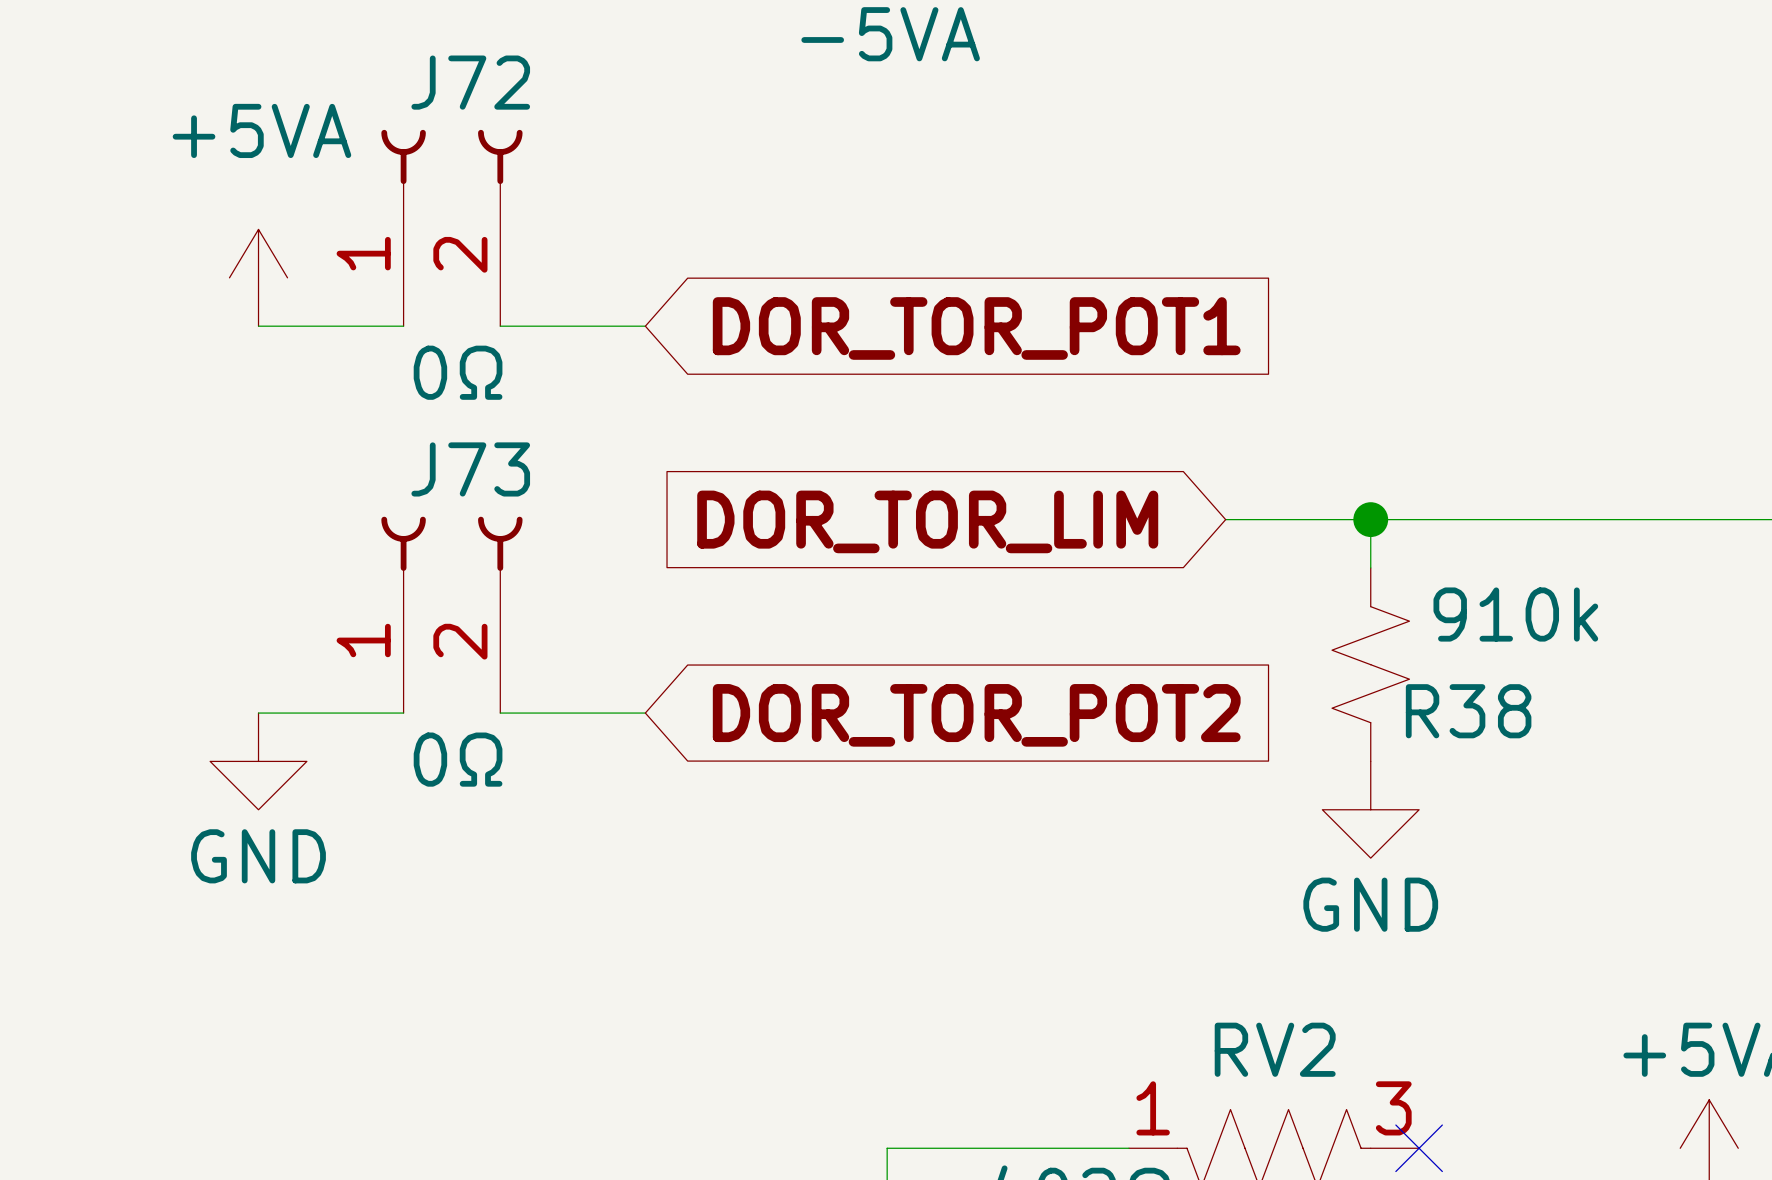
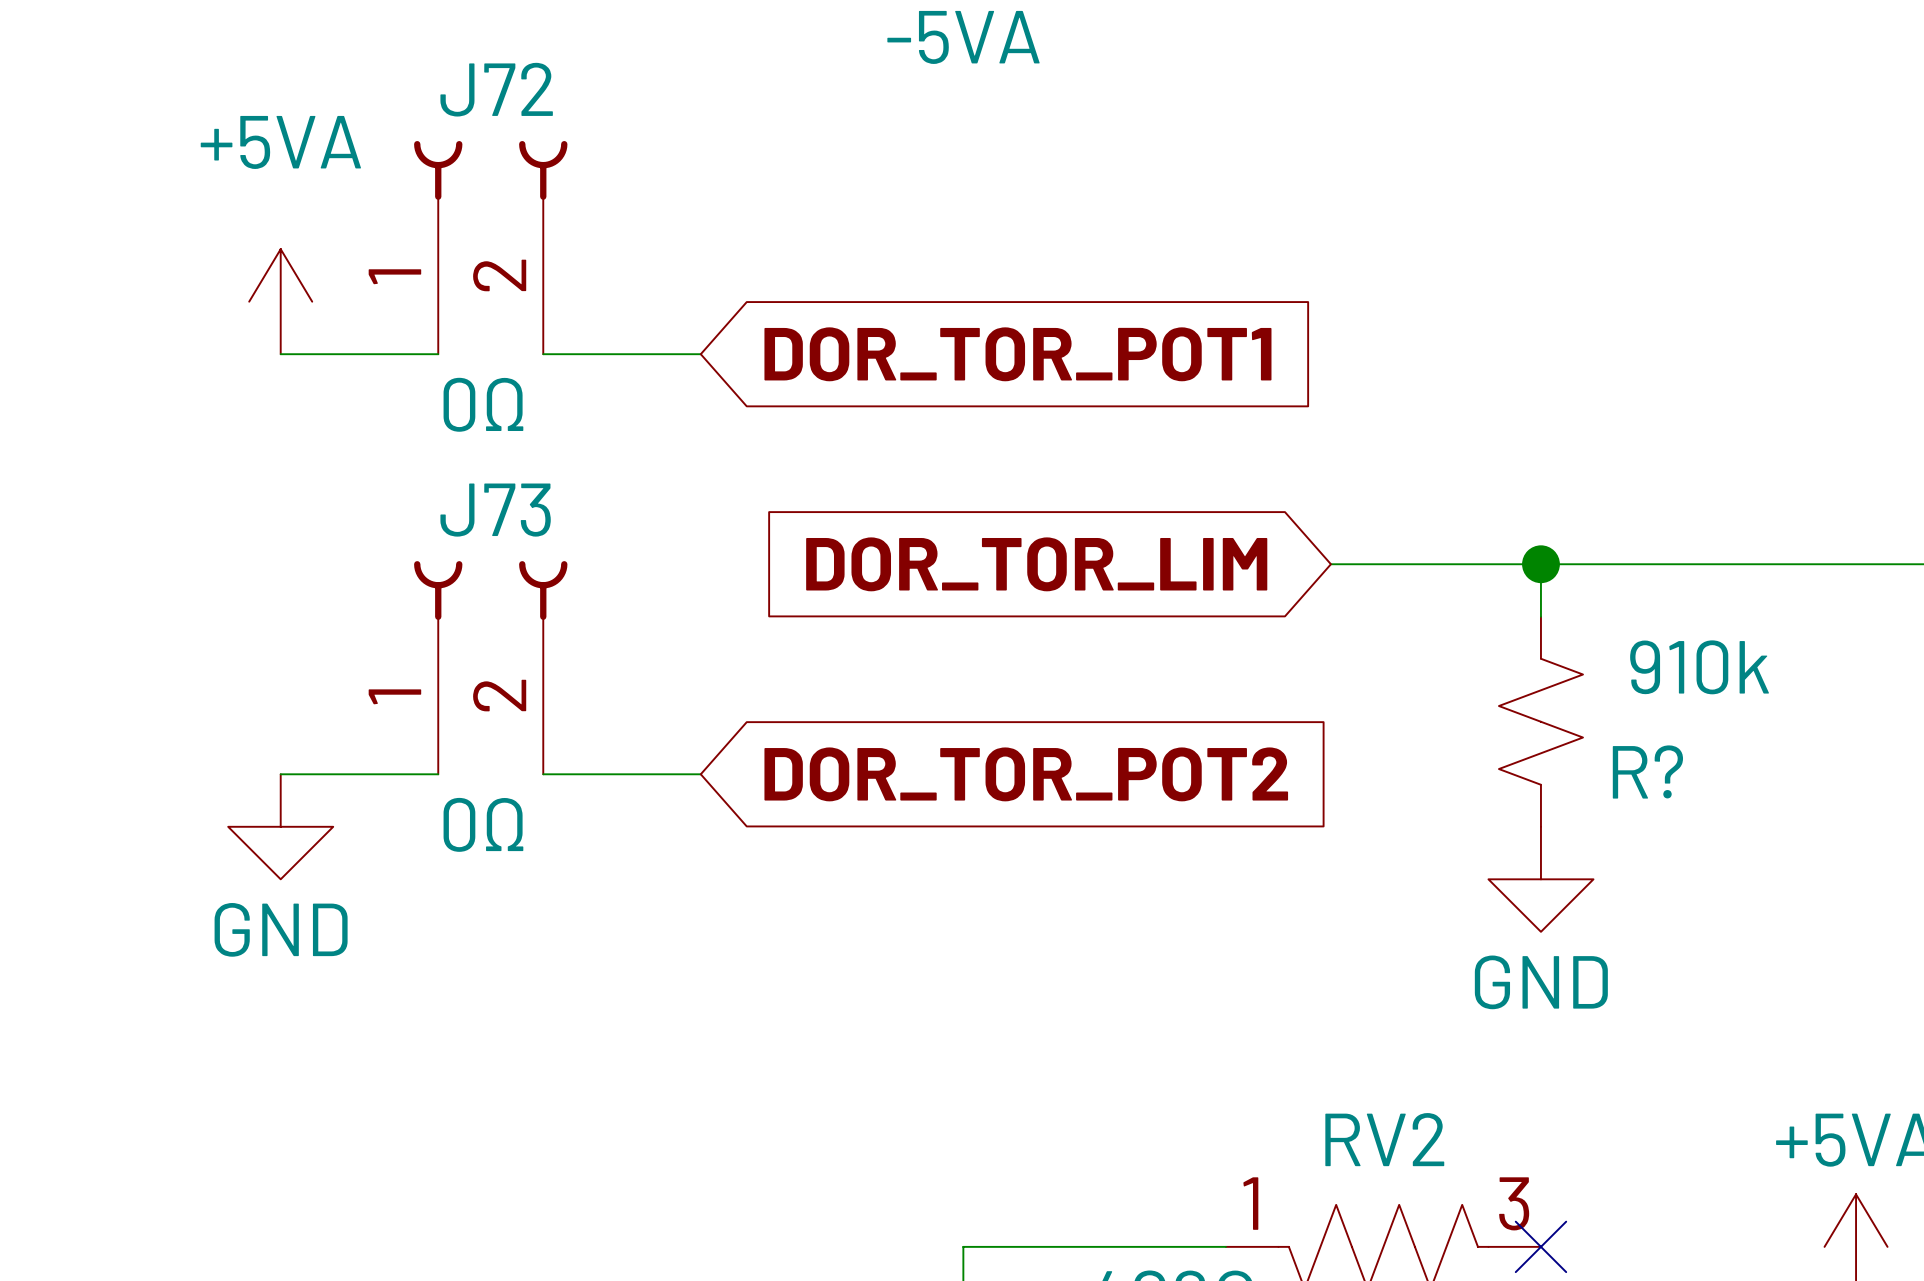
wire: (1370, 519) (1370, 567) -> (1540, 564) (1540, 616)
junction position: (1370, 519) -> (1540, 564)
R38: 910k (1370, 664) -> none
R?: none -> 910k (1540, 721)
power symbol position: GND (1370, 809) -> GND (1540, 879)

